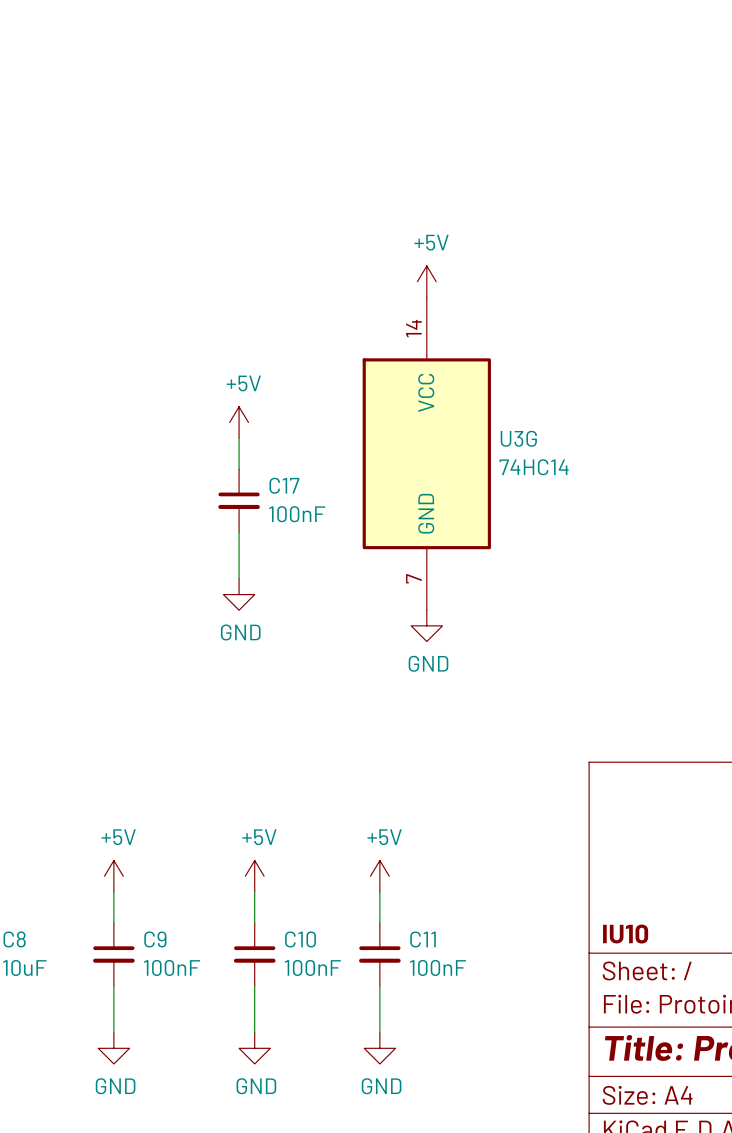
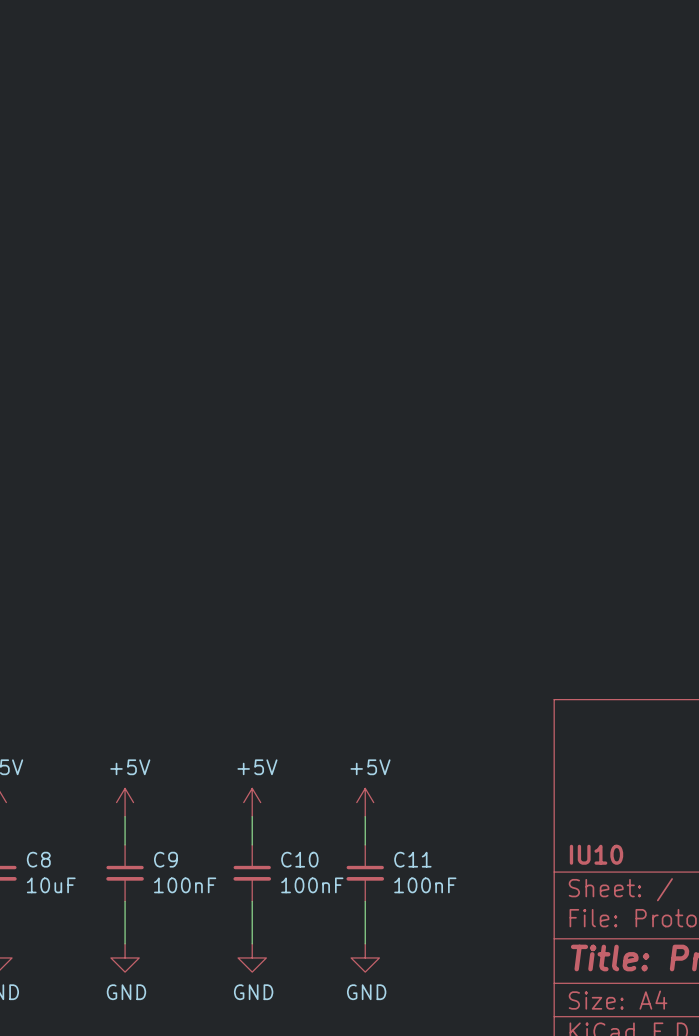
power symbol: +5V (426, 281) -> none
power symbol: +5V (239, 422) -> none
wire: (239, 438) (239, 469) -> none
U3G: 74HC14 (426, 453) -> none
C17: 100nF (239, 500) -> none
wire: (239, 532) (239, 578) -> none
power symbol: GND (239, 594) -> none
power symbol: GND (426, 625) -> none

